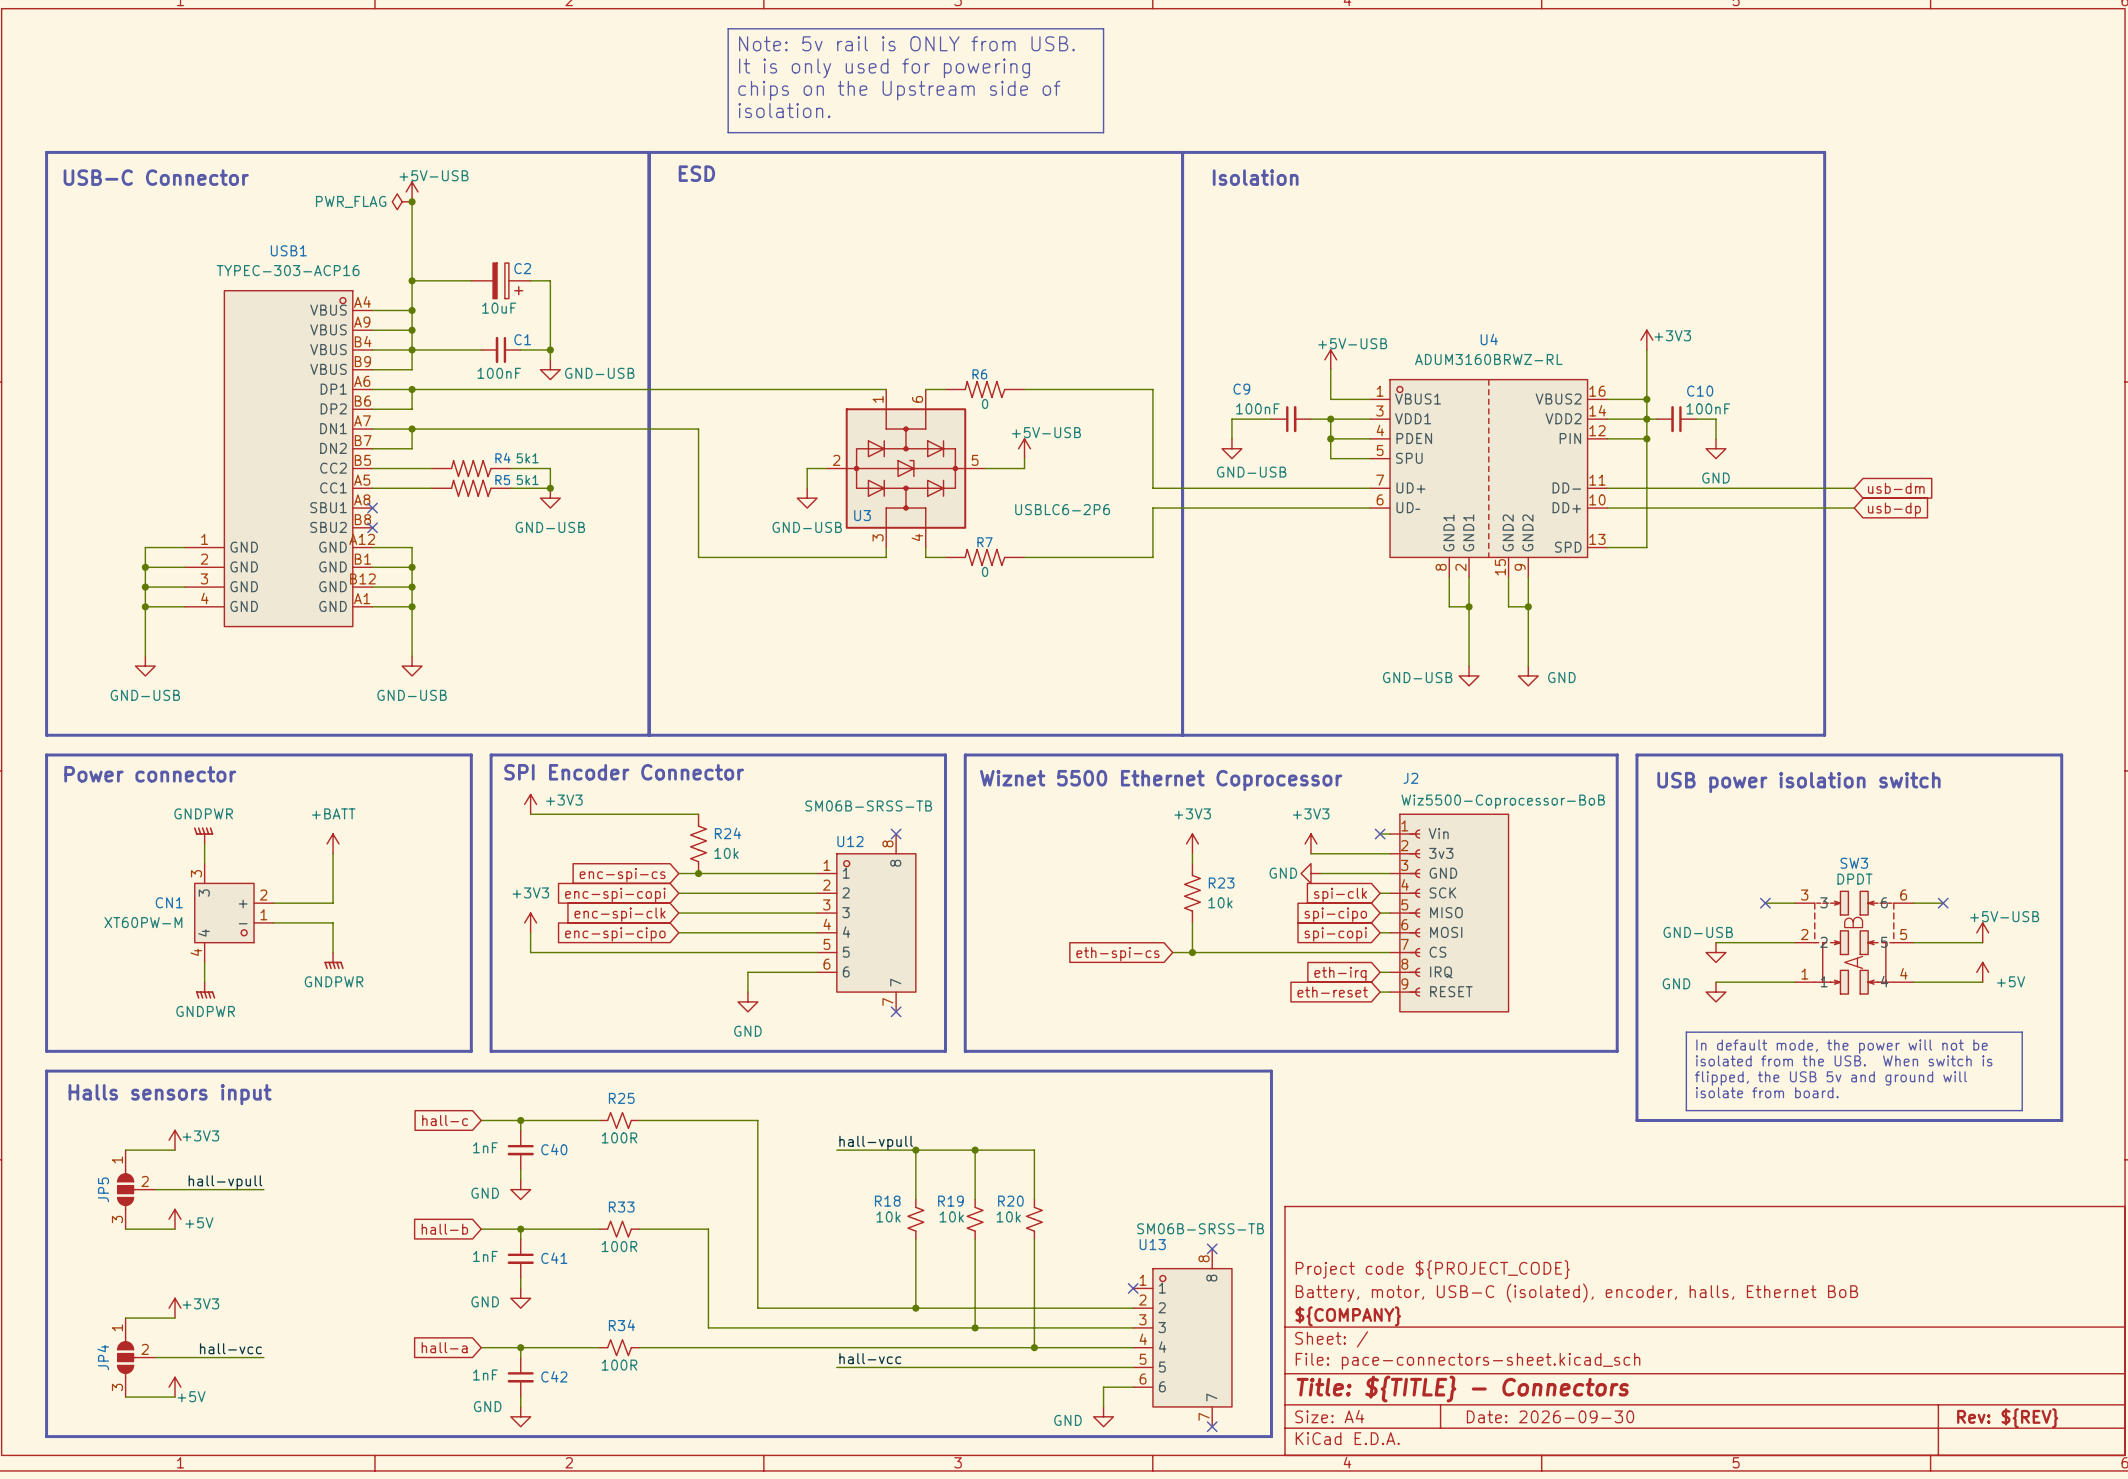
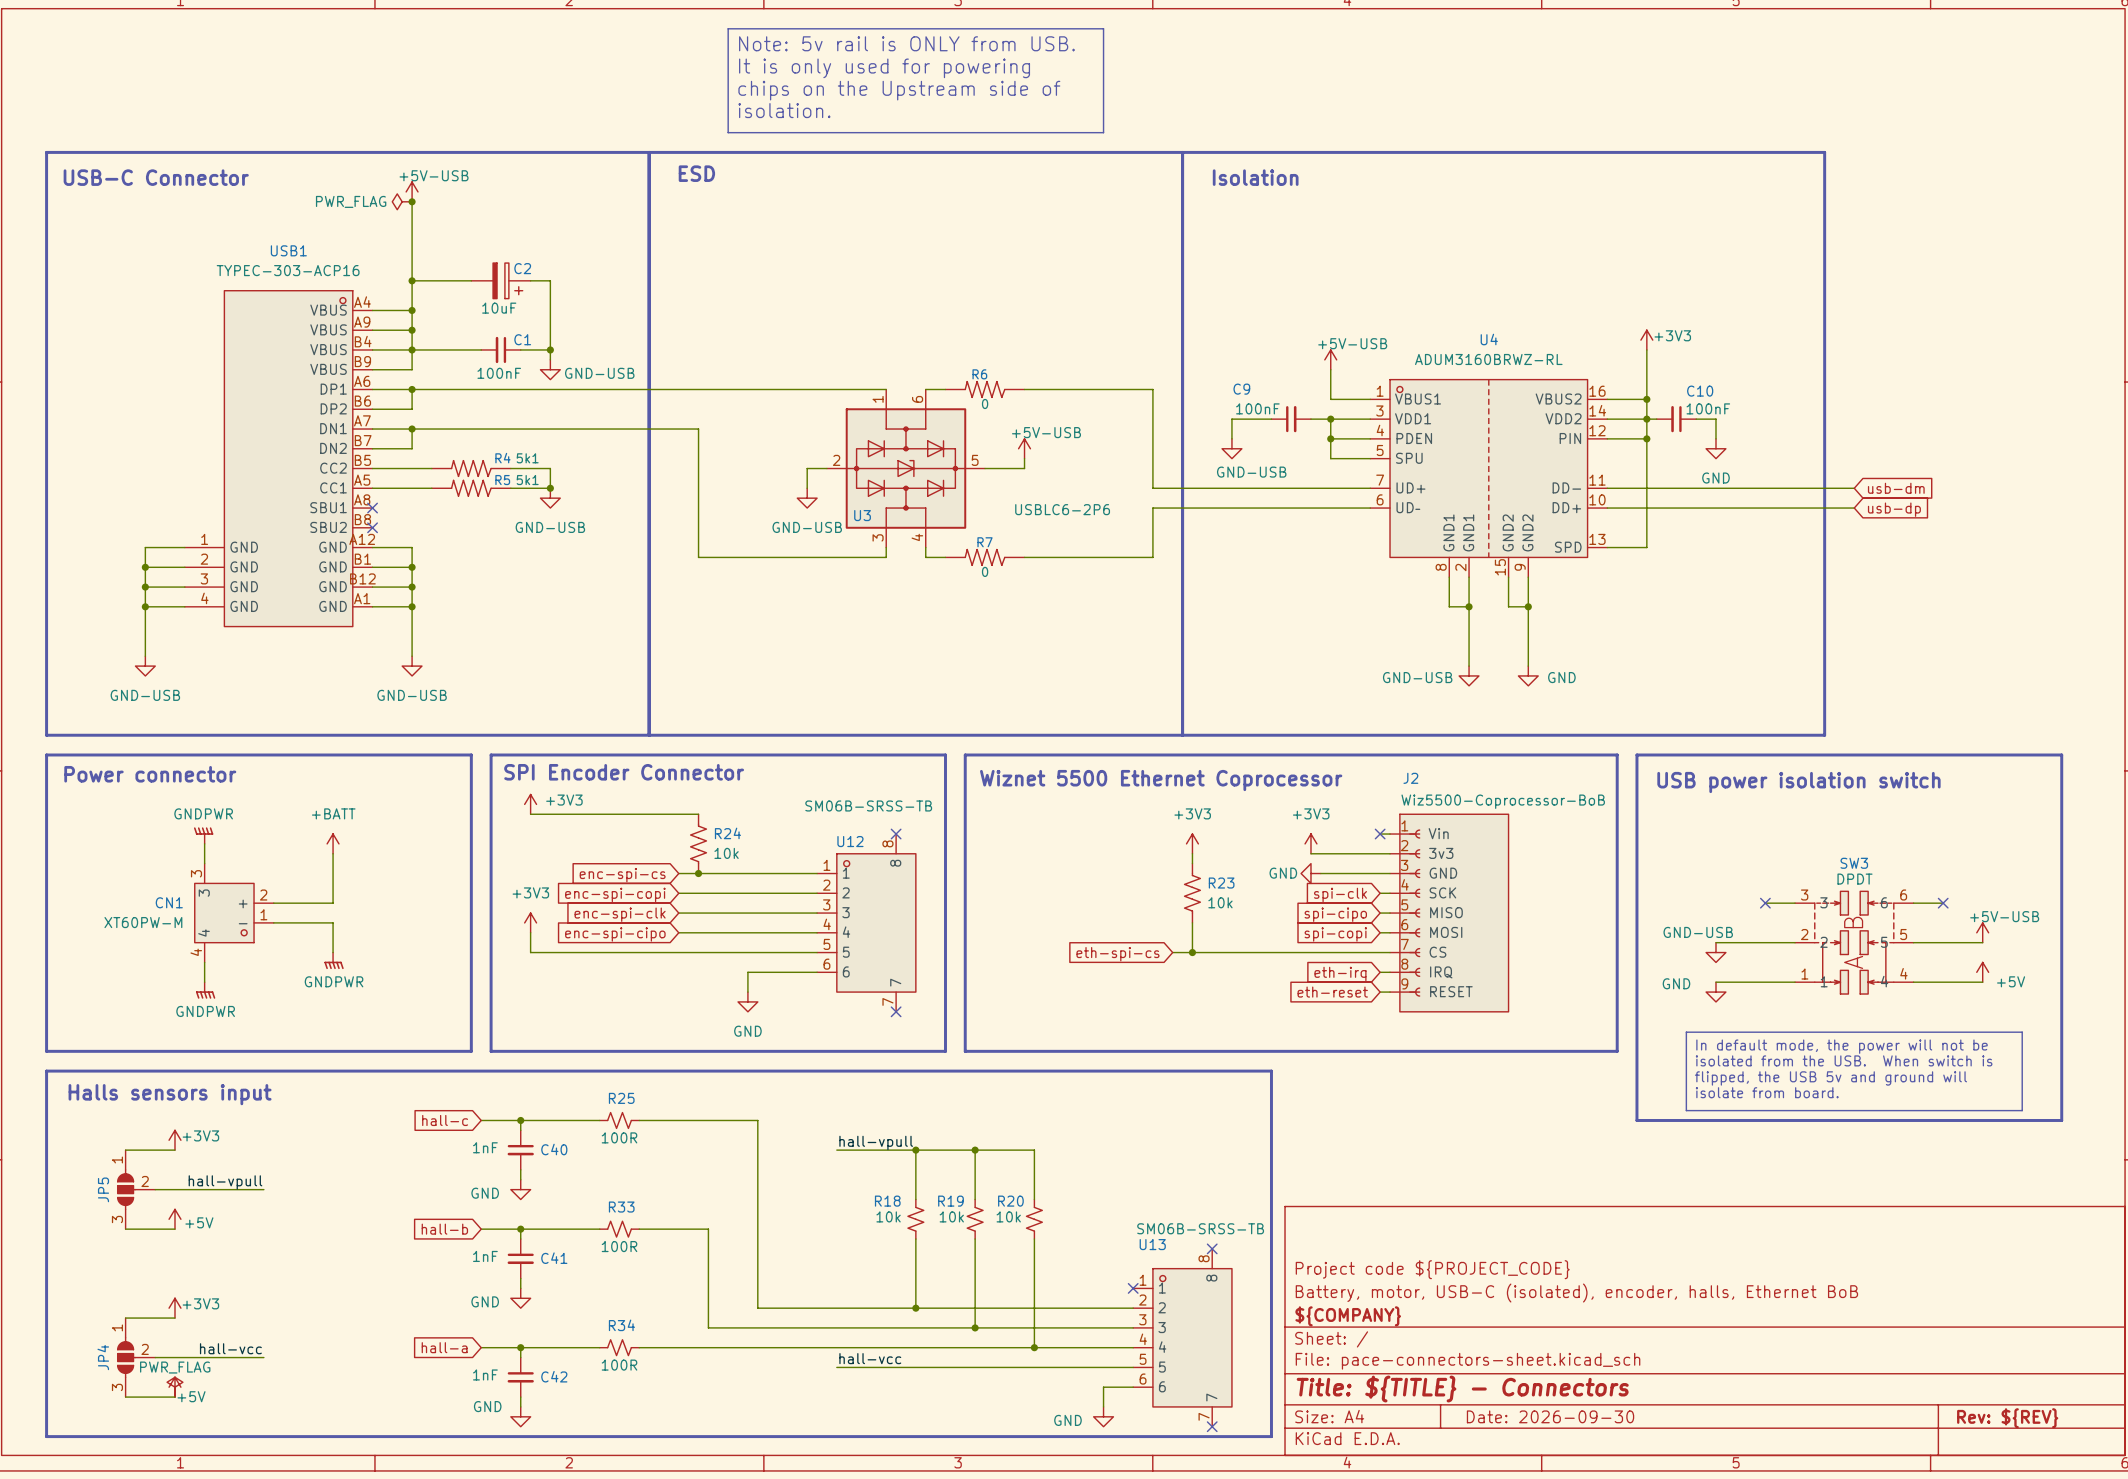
power symbol: none -> PWR_FLAG (174, 1387)

